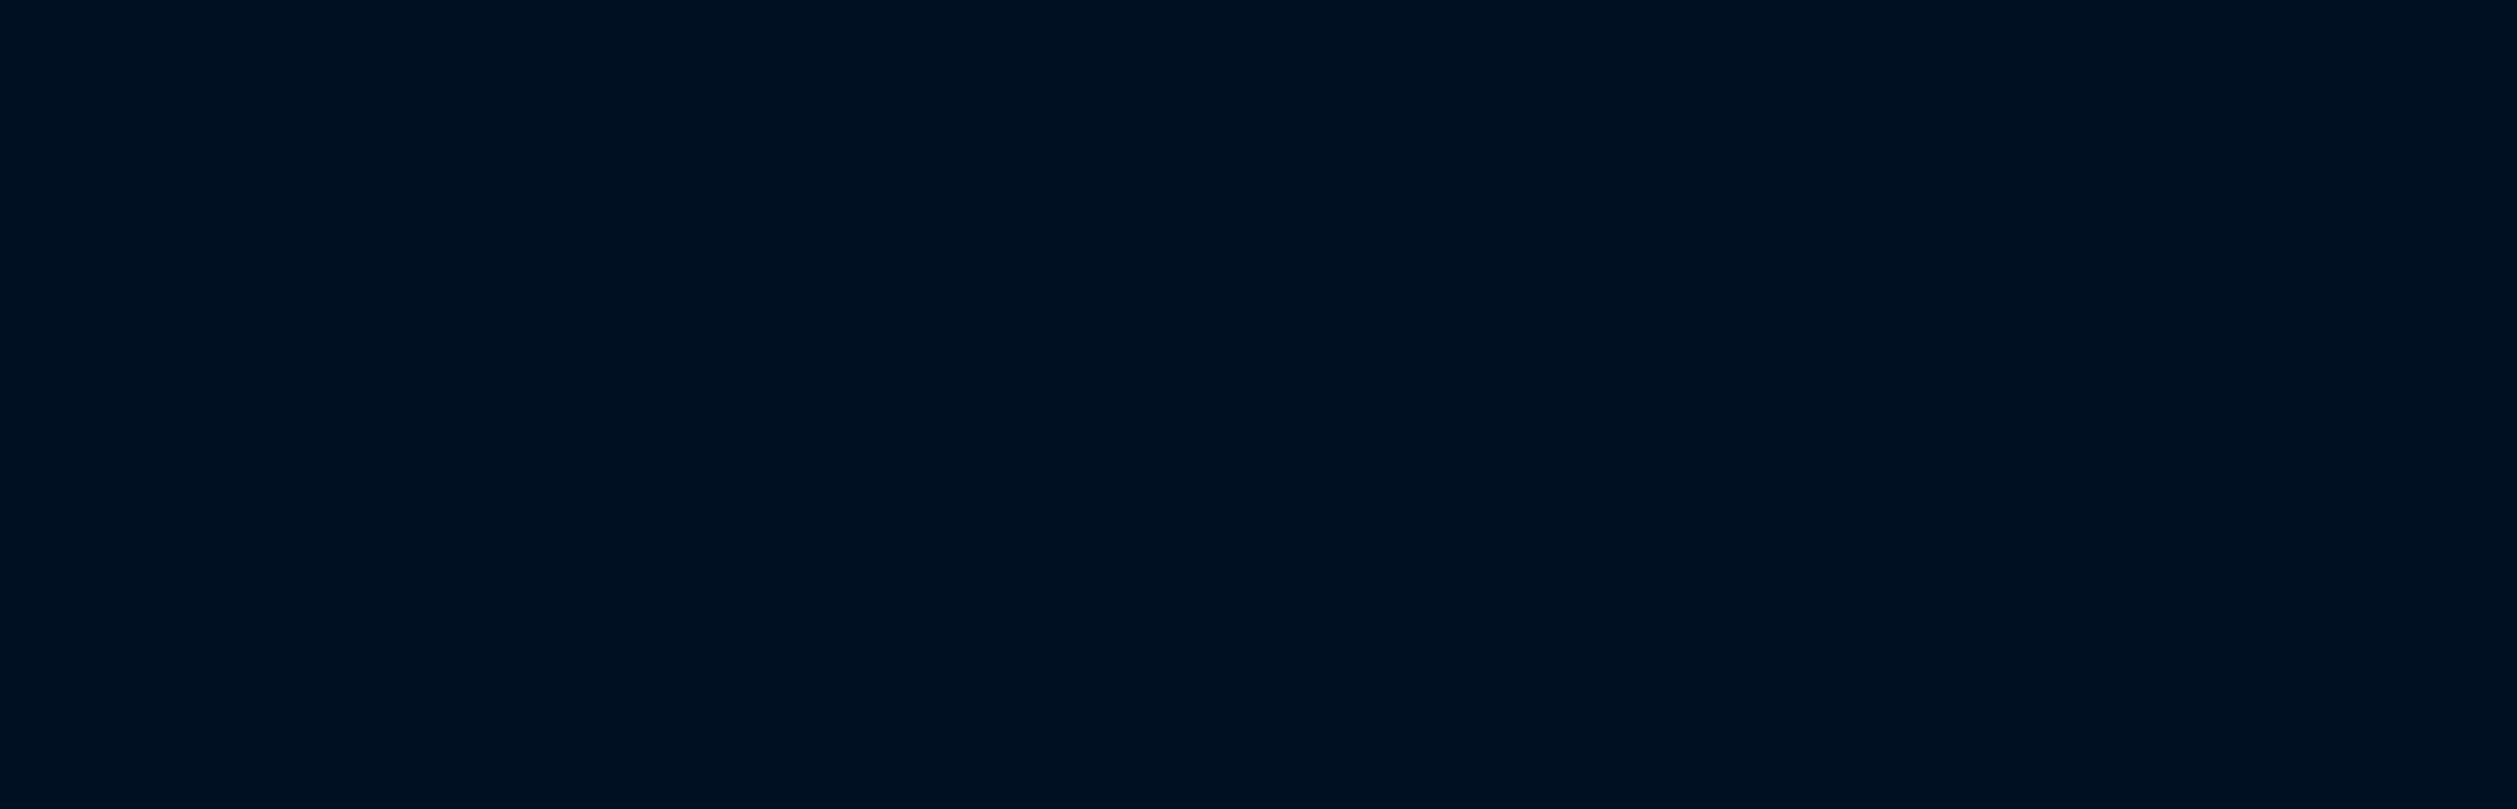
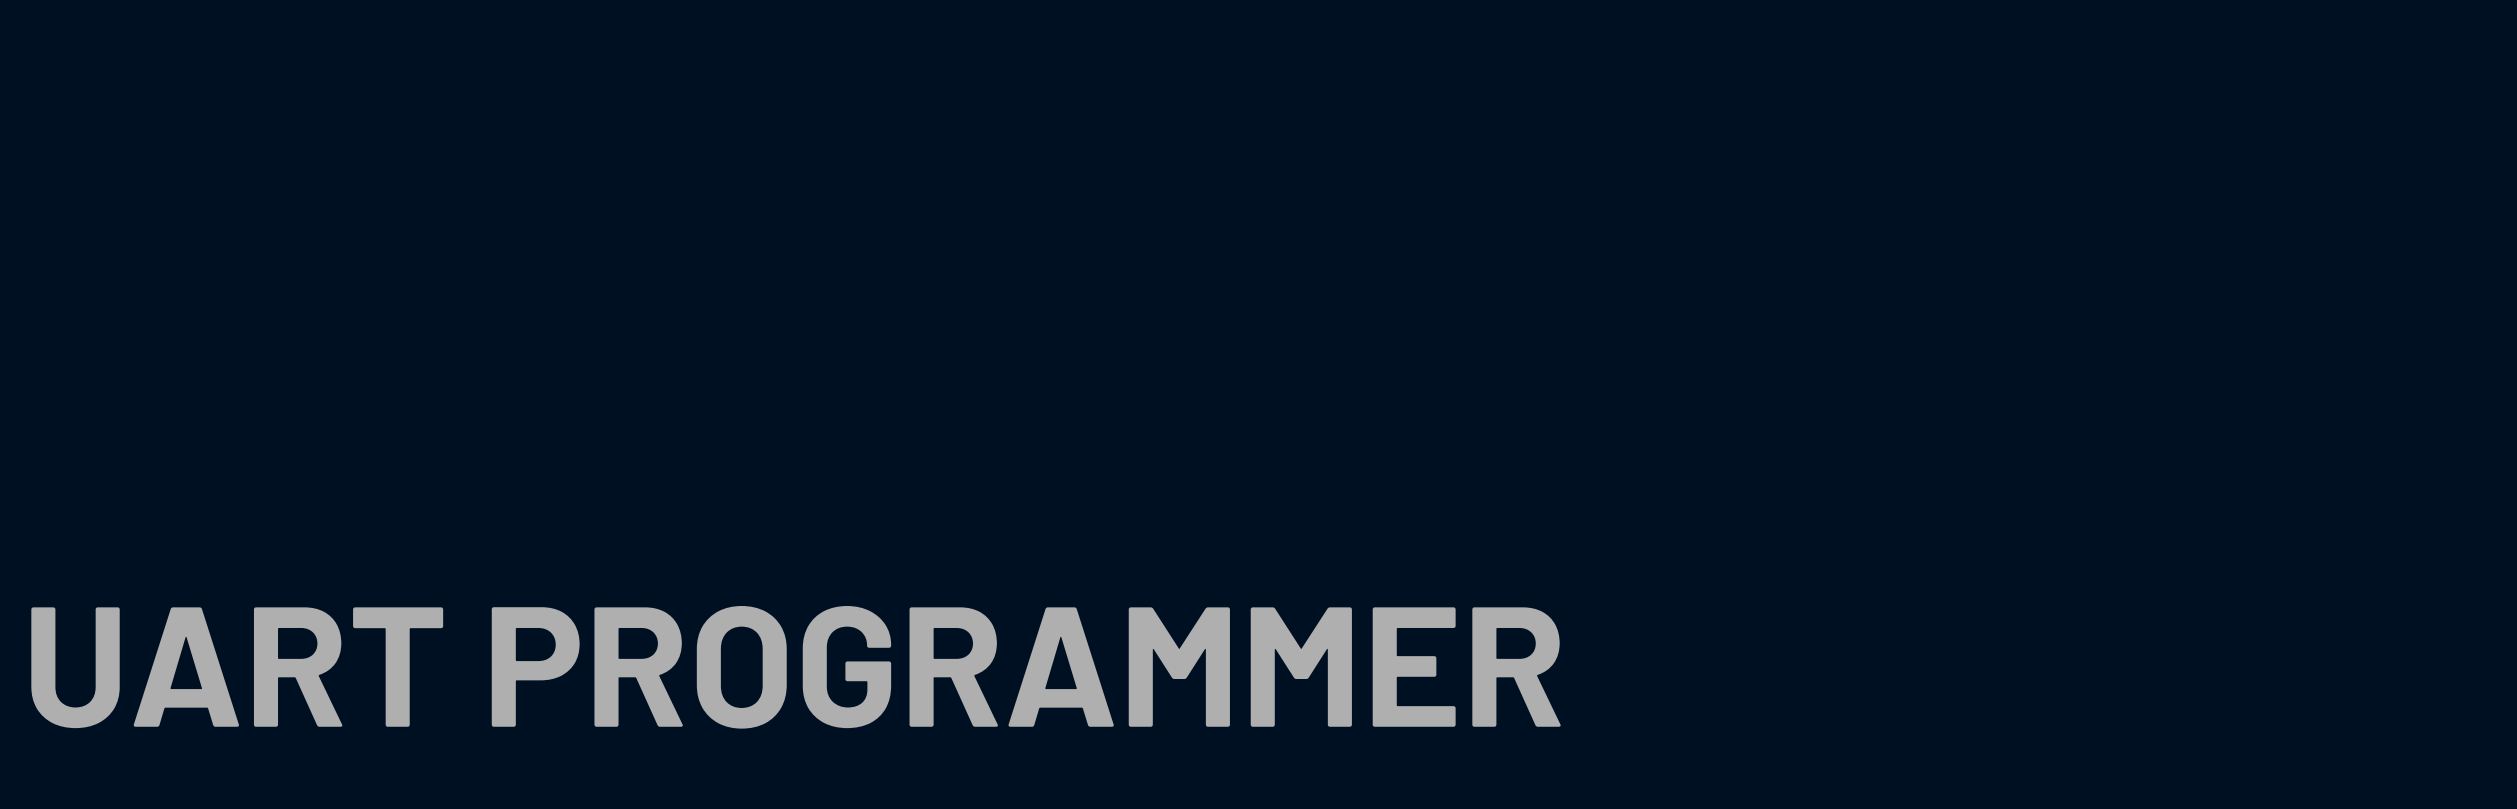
text: none -> UART PROGRAMMER (796, 667)

